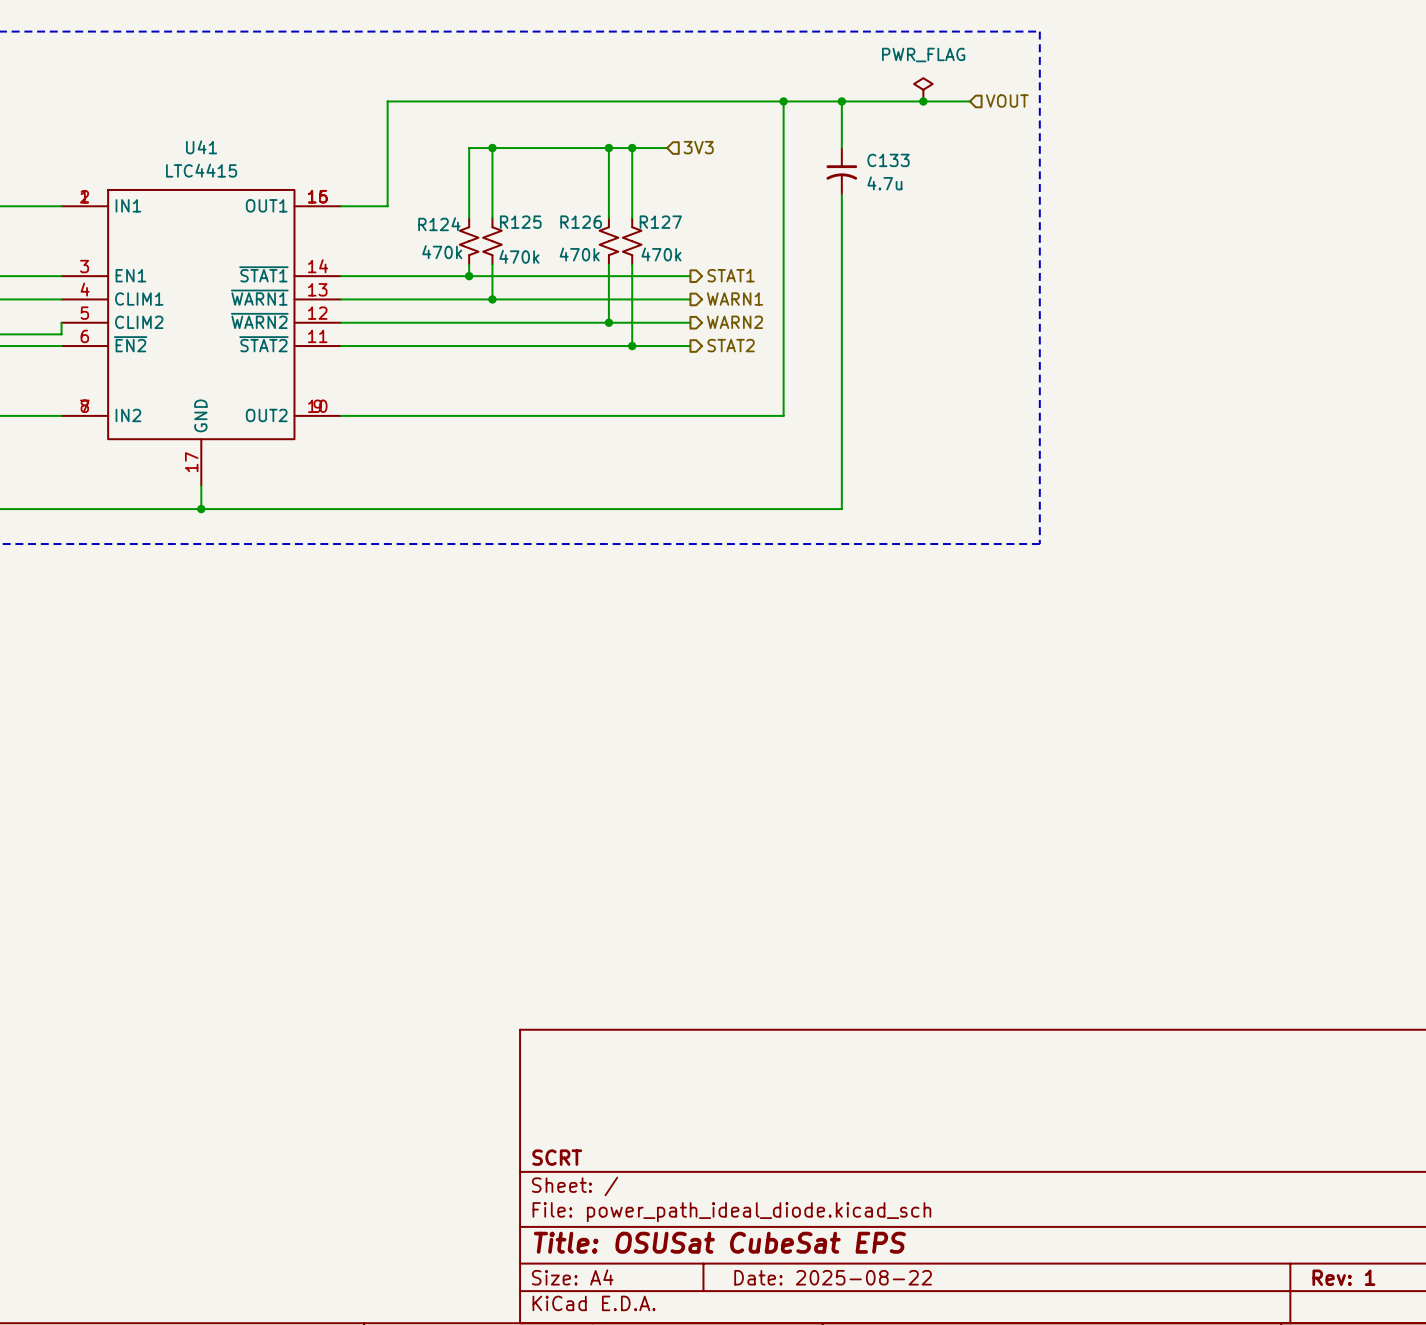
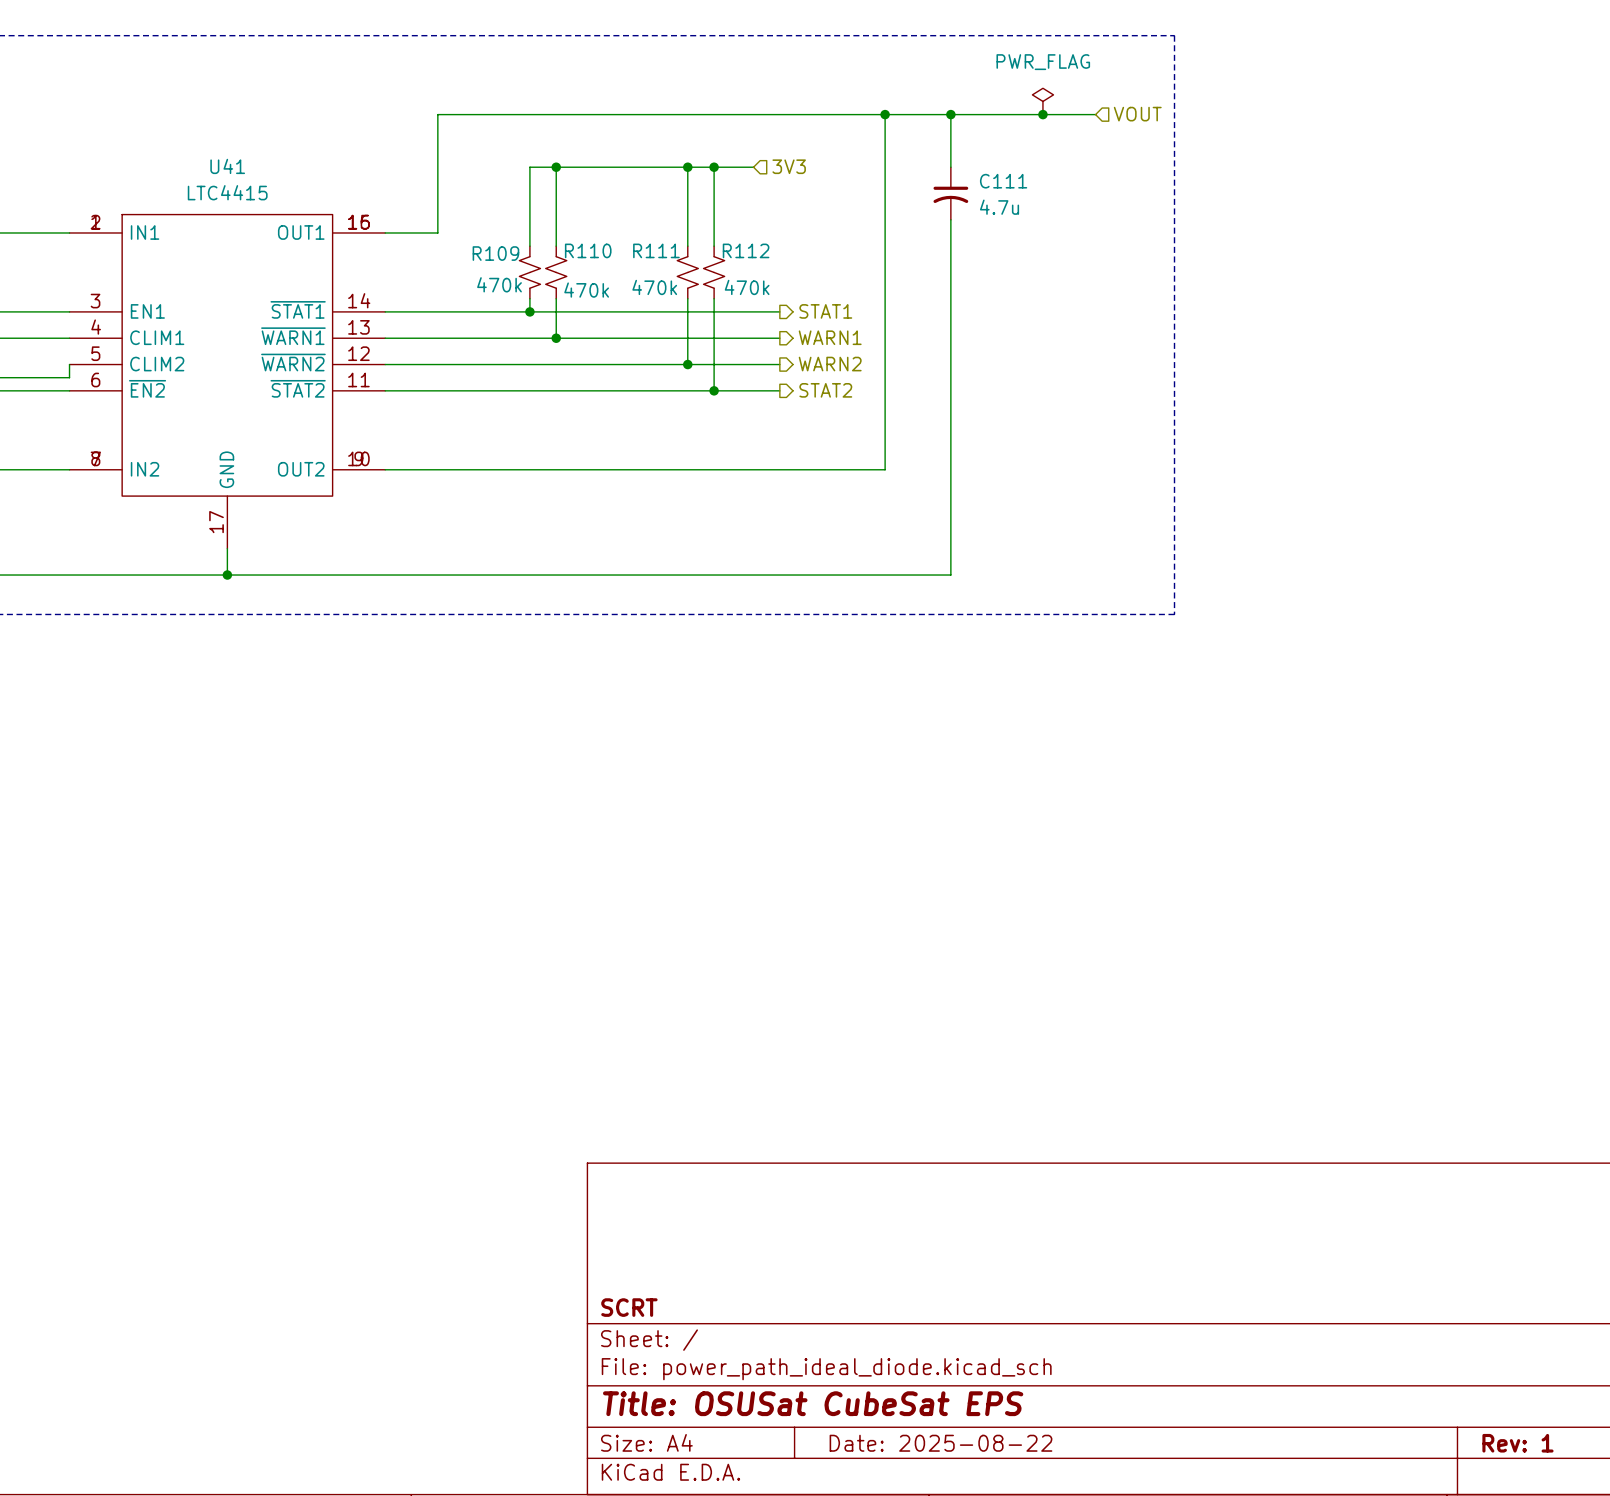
C133 name: C133 (888, 160) -> C111 (1003, 181)
R125 name: R125 (520, 222) -> R110 (588, 250)
R126 name: R126 (581, 222) -> R111 (656, 250)
R127 name: R127 (660, 222) -> R112 (746, 250)
R124 name: R124 (439, 224) -> R109 (495, 253)

